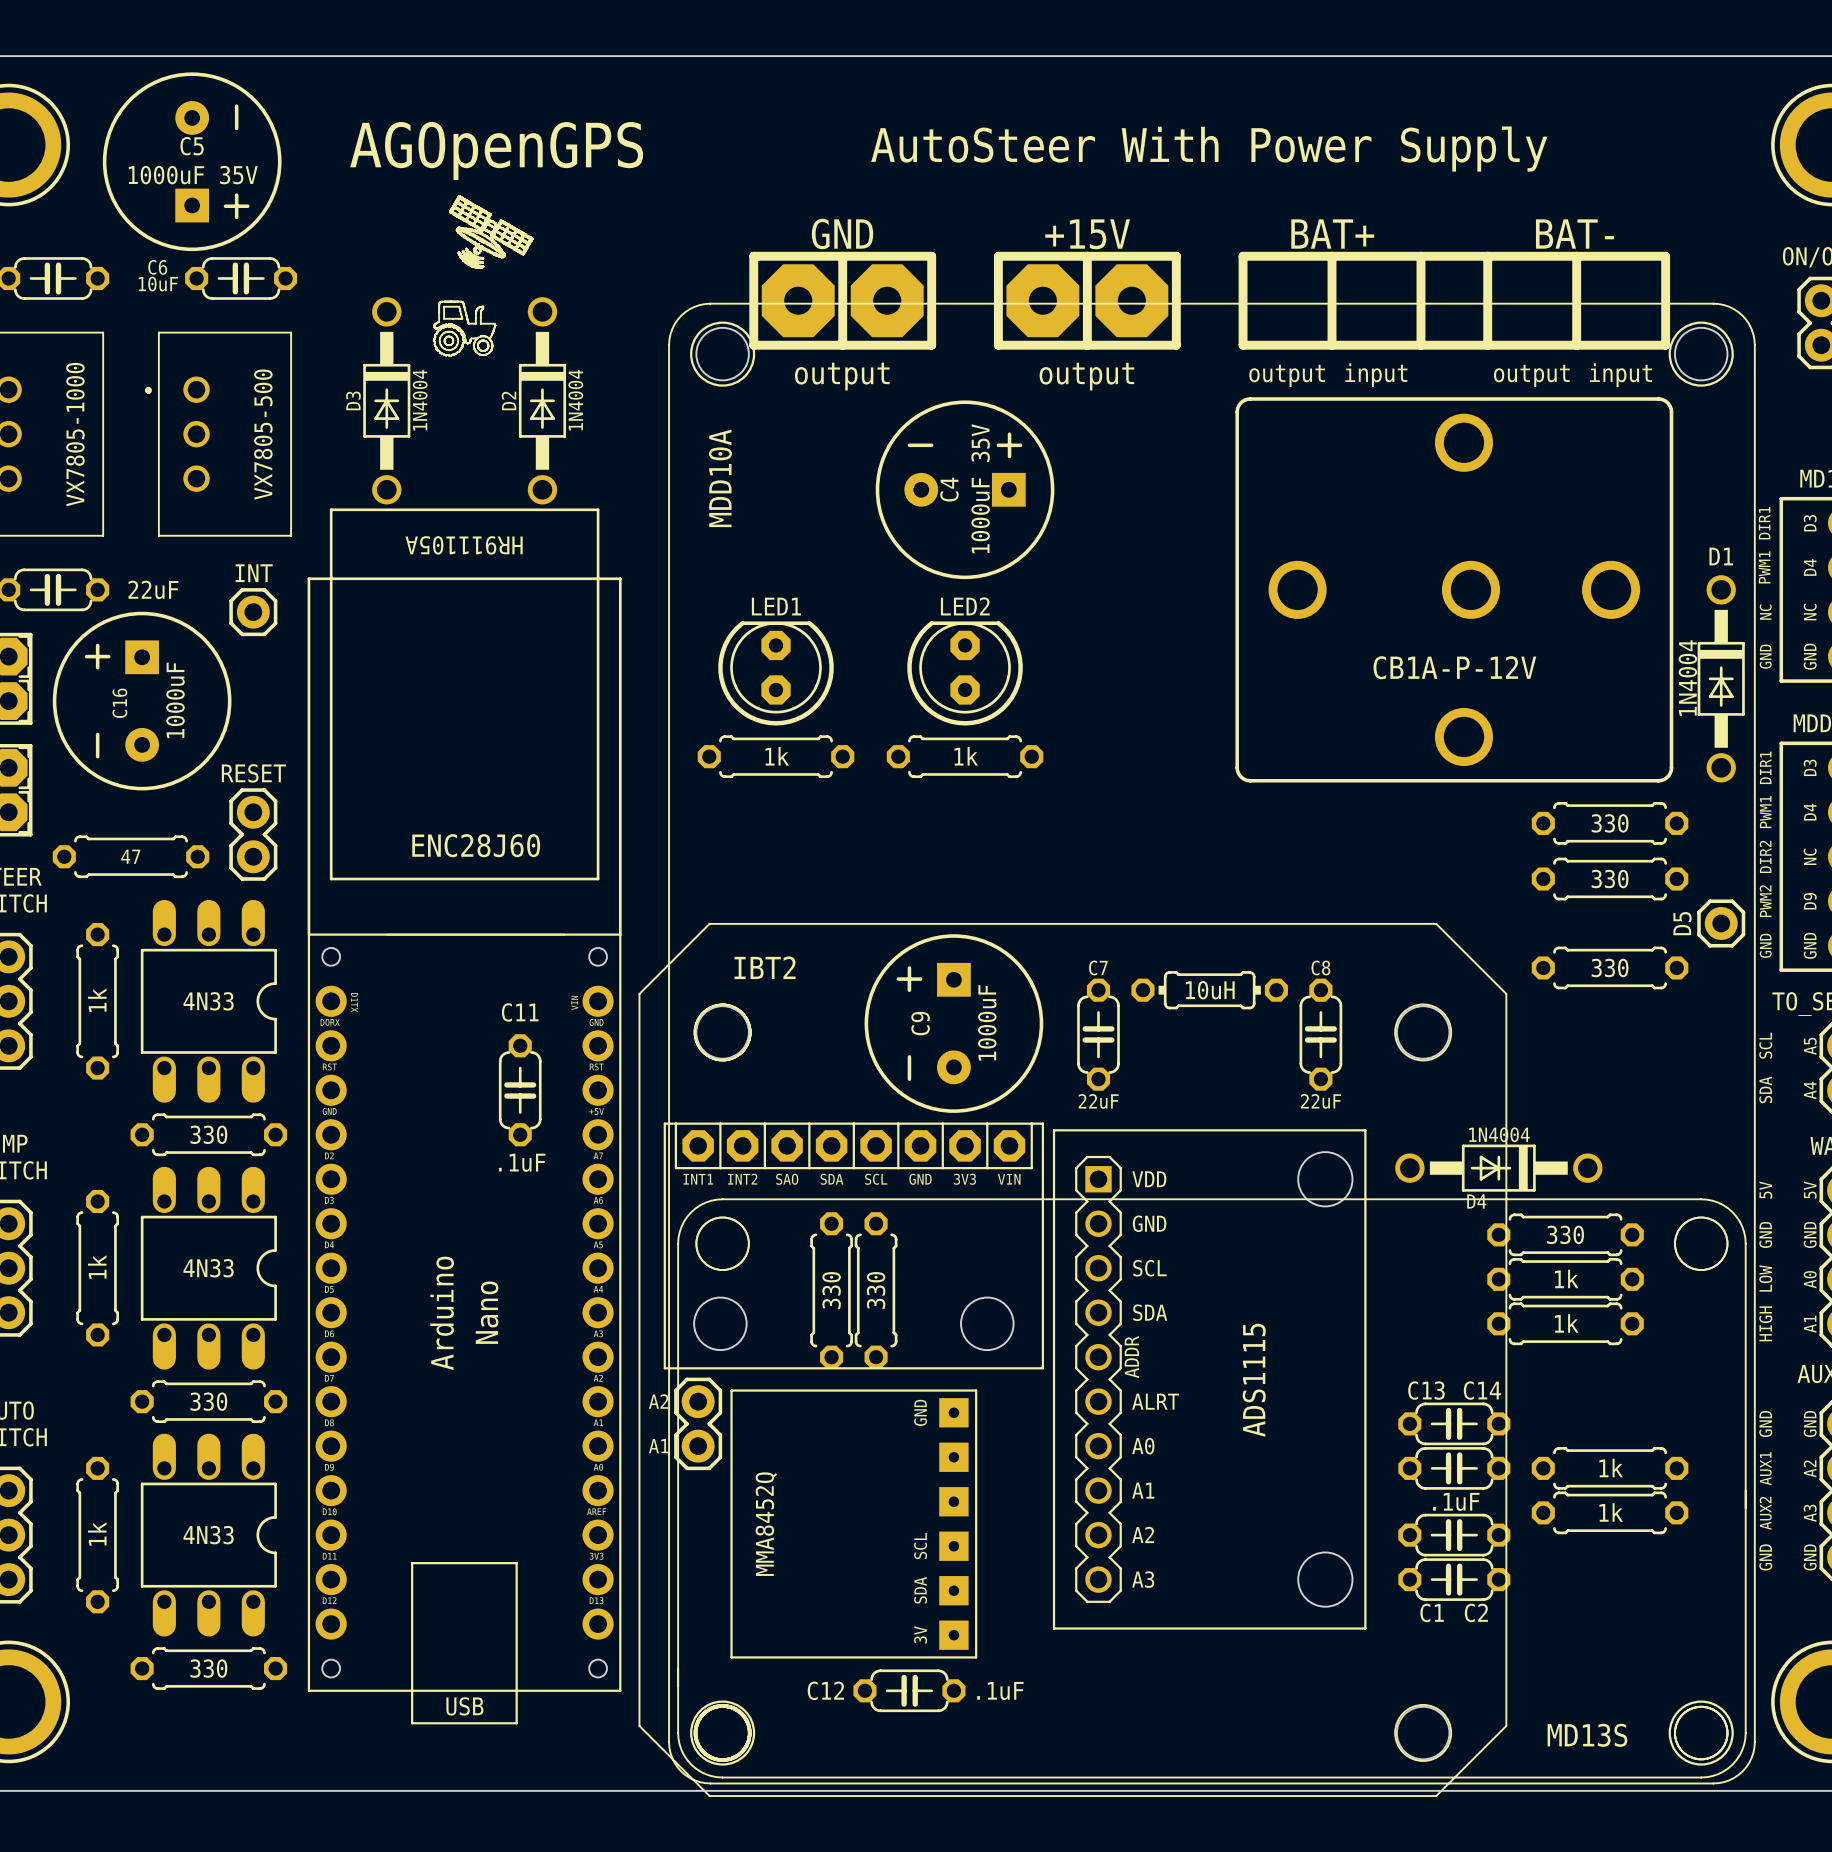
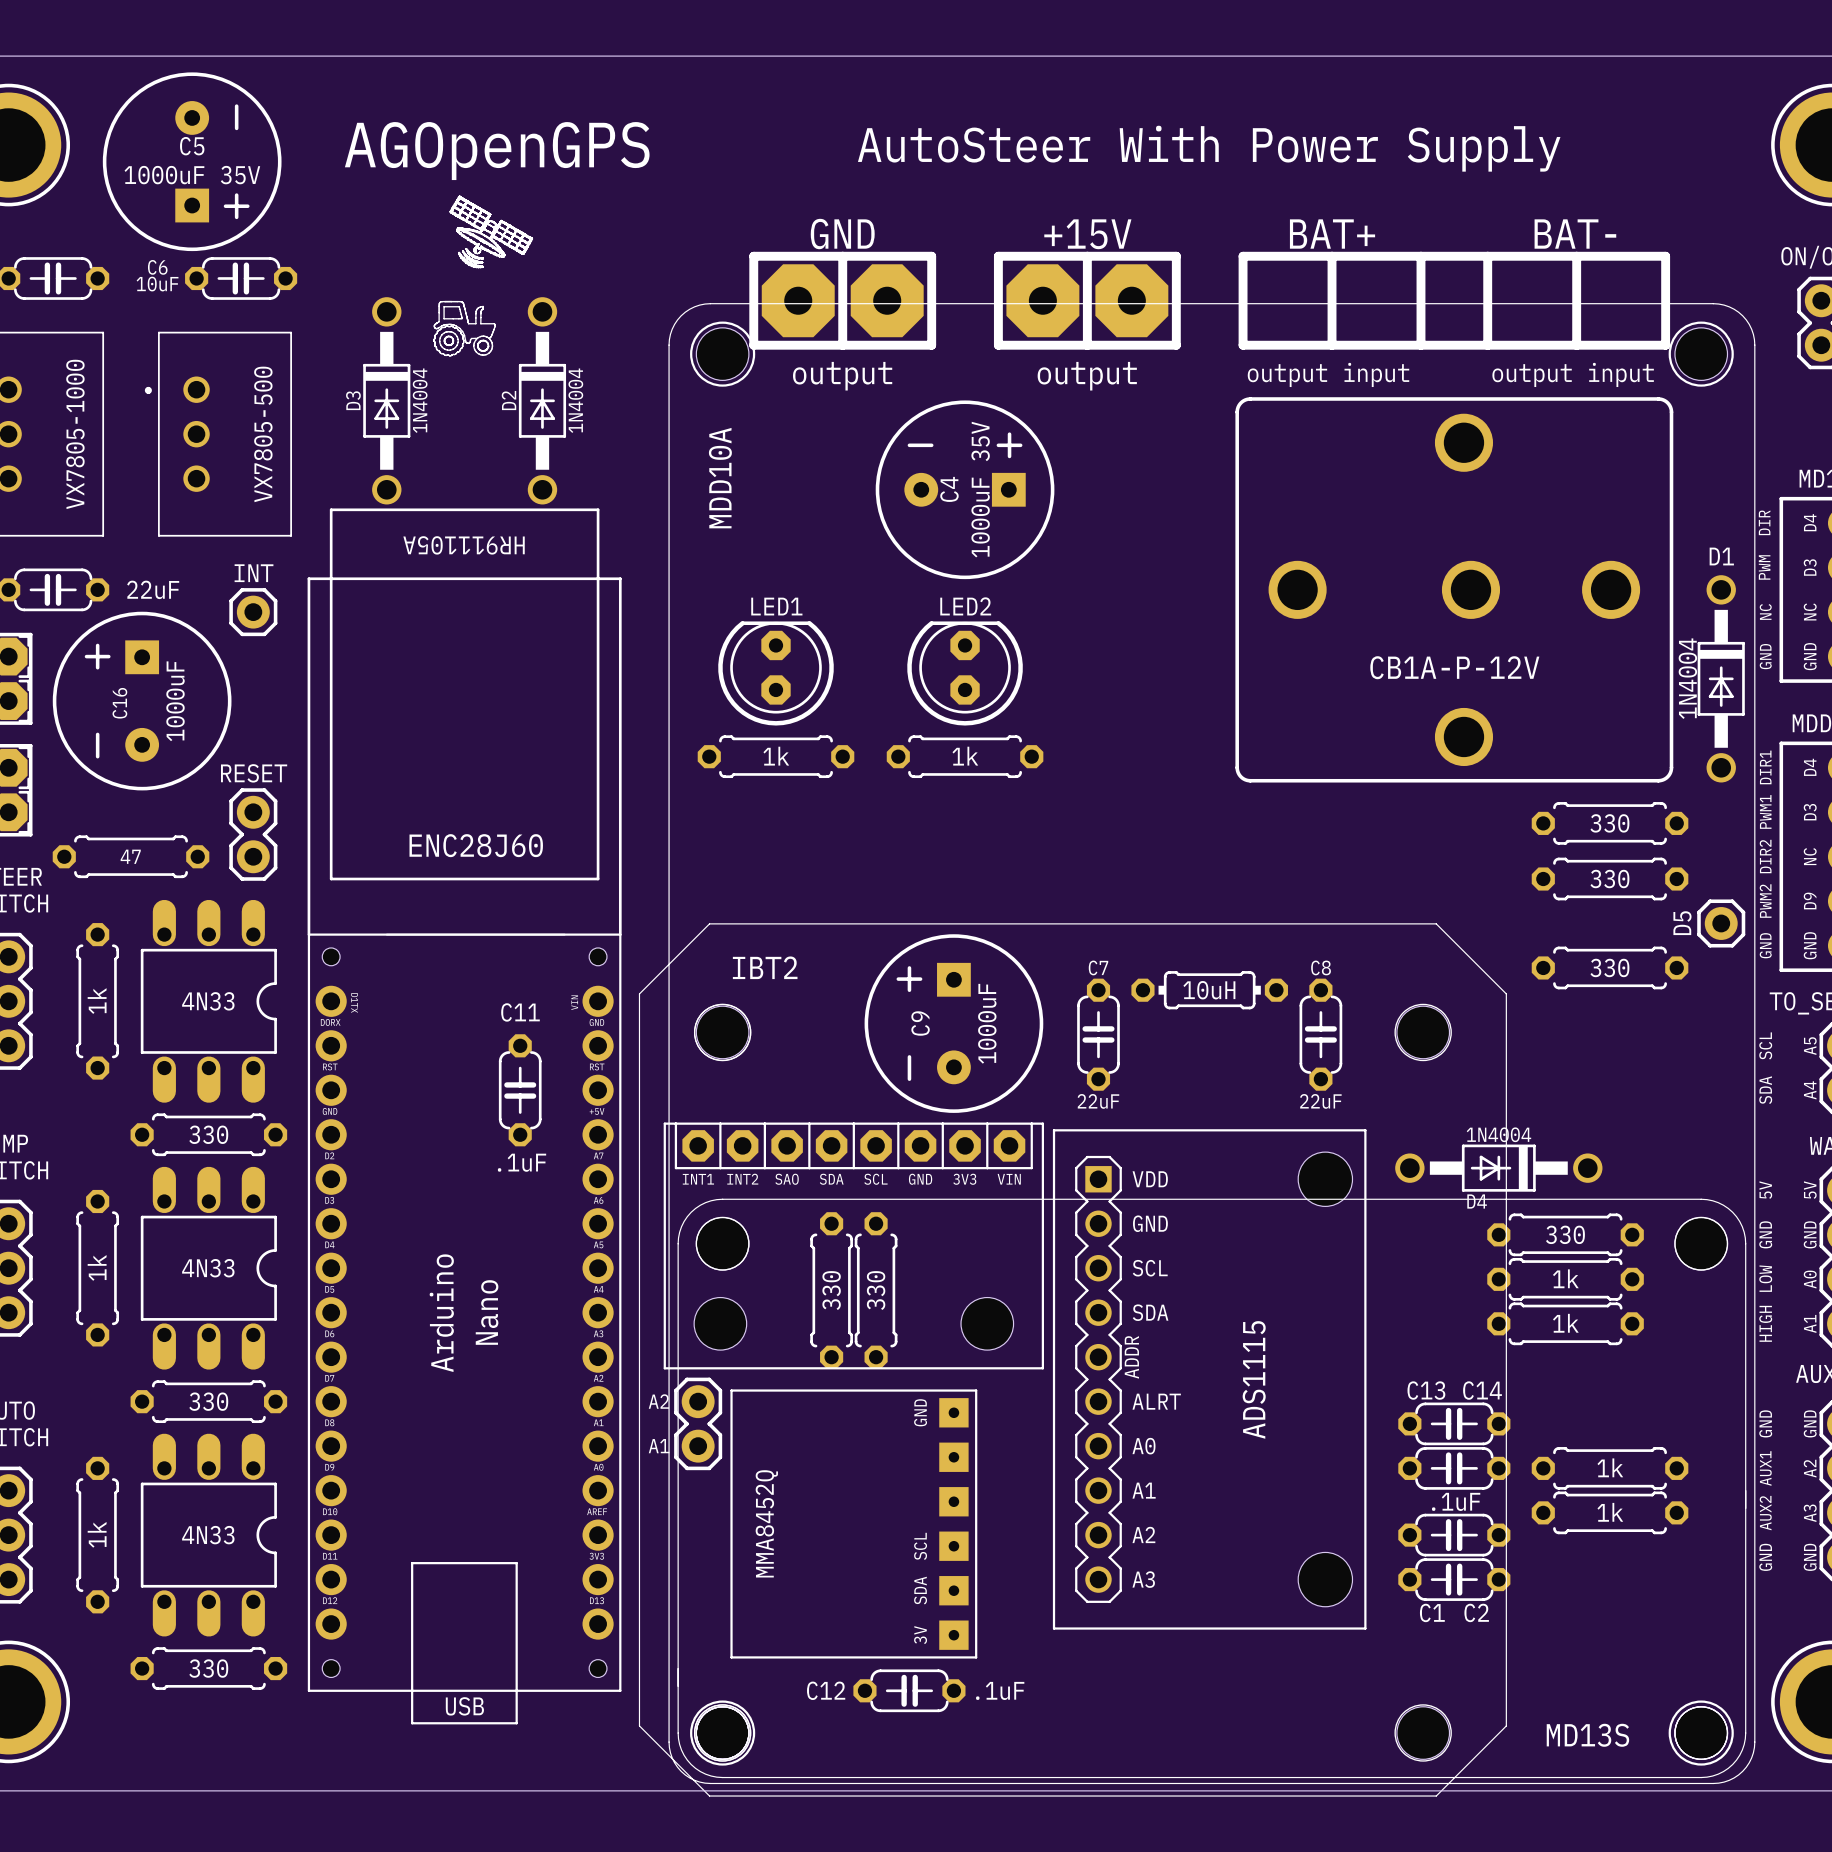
text: DIR1 (1764, 523) -> DIR (1764, 522)
text: D3 (1810, 523) -> D4 (1810, 522)
text: PWM1 (1764, 567) -> PWM (1764, 567)
text: D4 (1810, 567) -> D3 (1810, 567)
text: D3 (1810, 767) -> D4 (1810, 767)
text: D4 (1810, 812) -> D3 (1810, 812)

